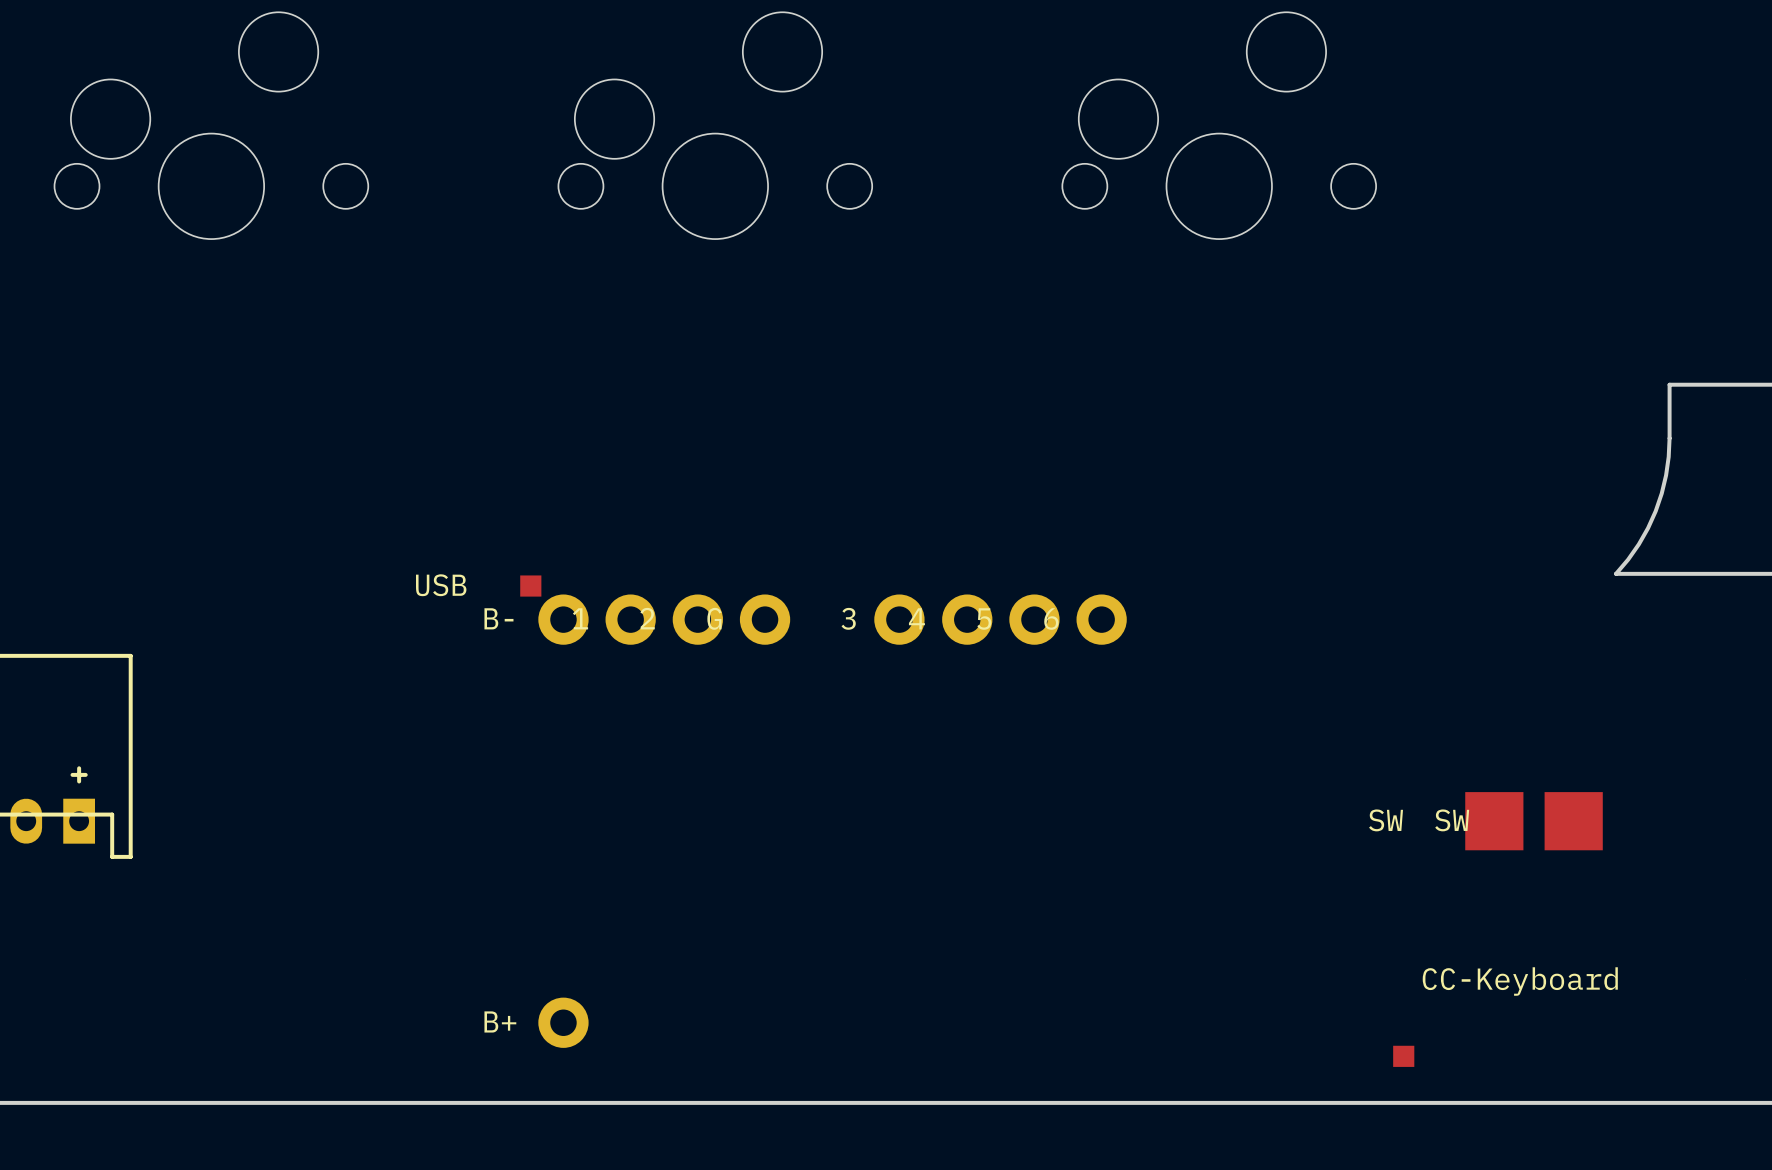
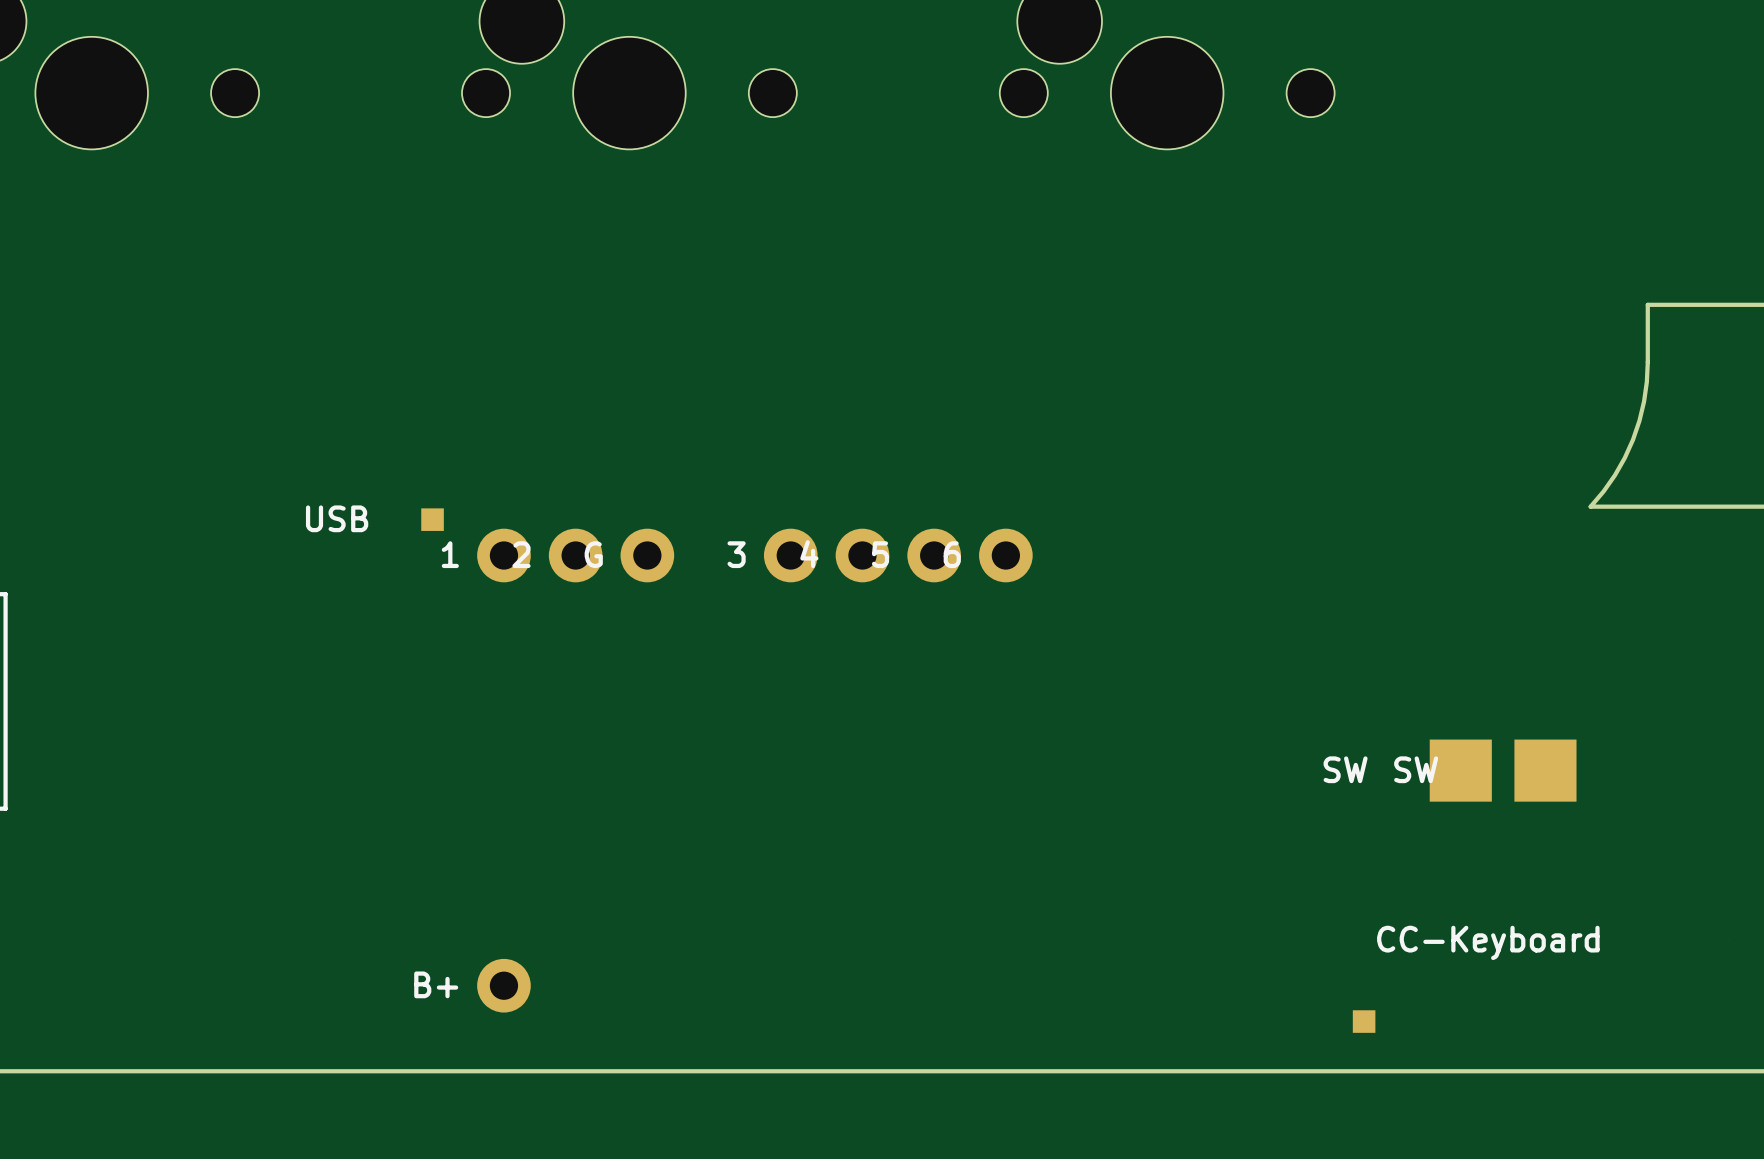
part: (563, 619) -> none
part position: (630, 619) -> (503, 555)
part position: (697, 619) -> (575, 555)
part position: (765, 619) -> (647, 555)
part position: (899, 619) -> (790, 555)
part position: (967, 619) -> (862, 555)
part position: (1034, 619) -> (934, 555)
part position: (1101, 619) -> (1005, 555)
part position: (563, 1022) -> (503, 985)

